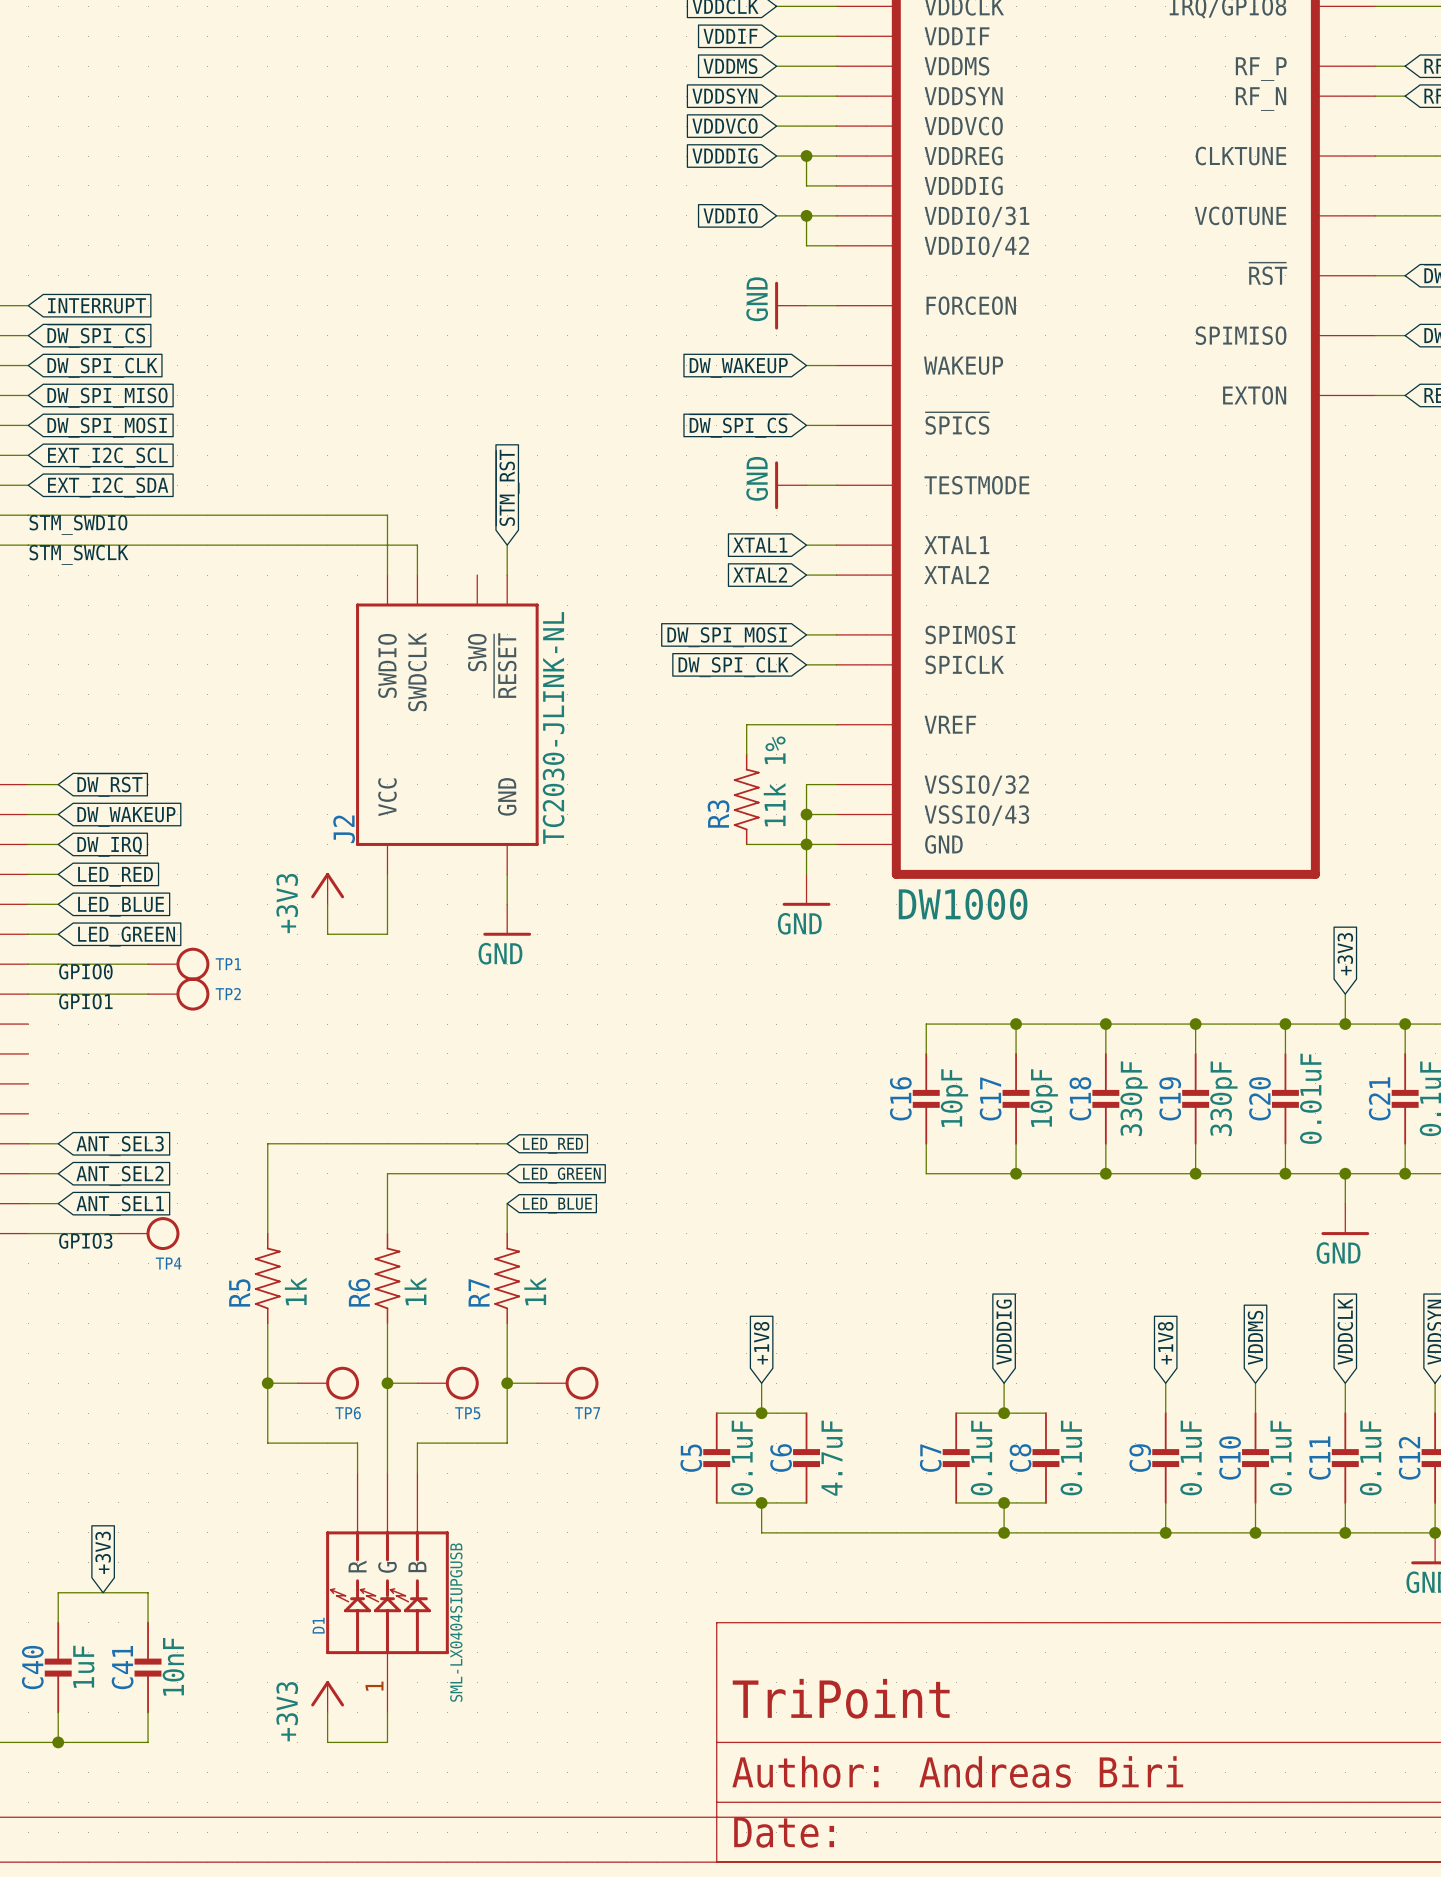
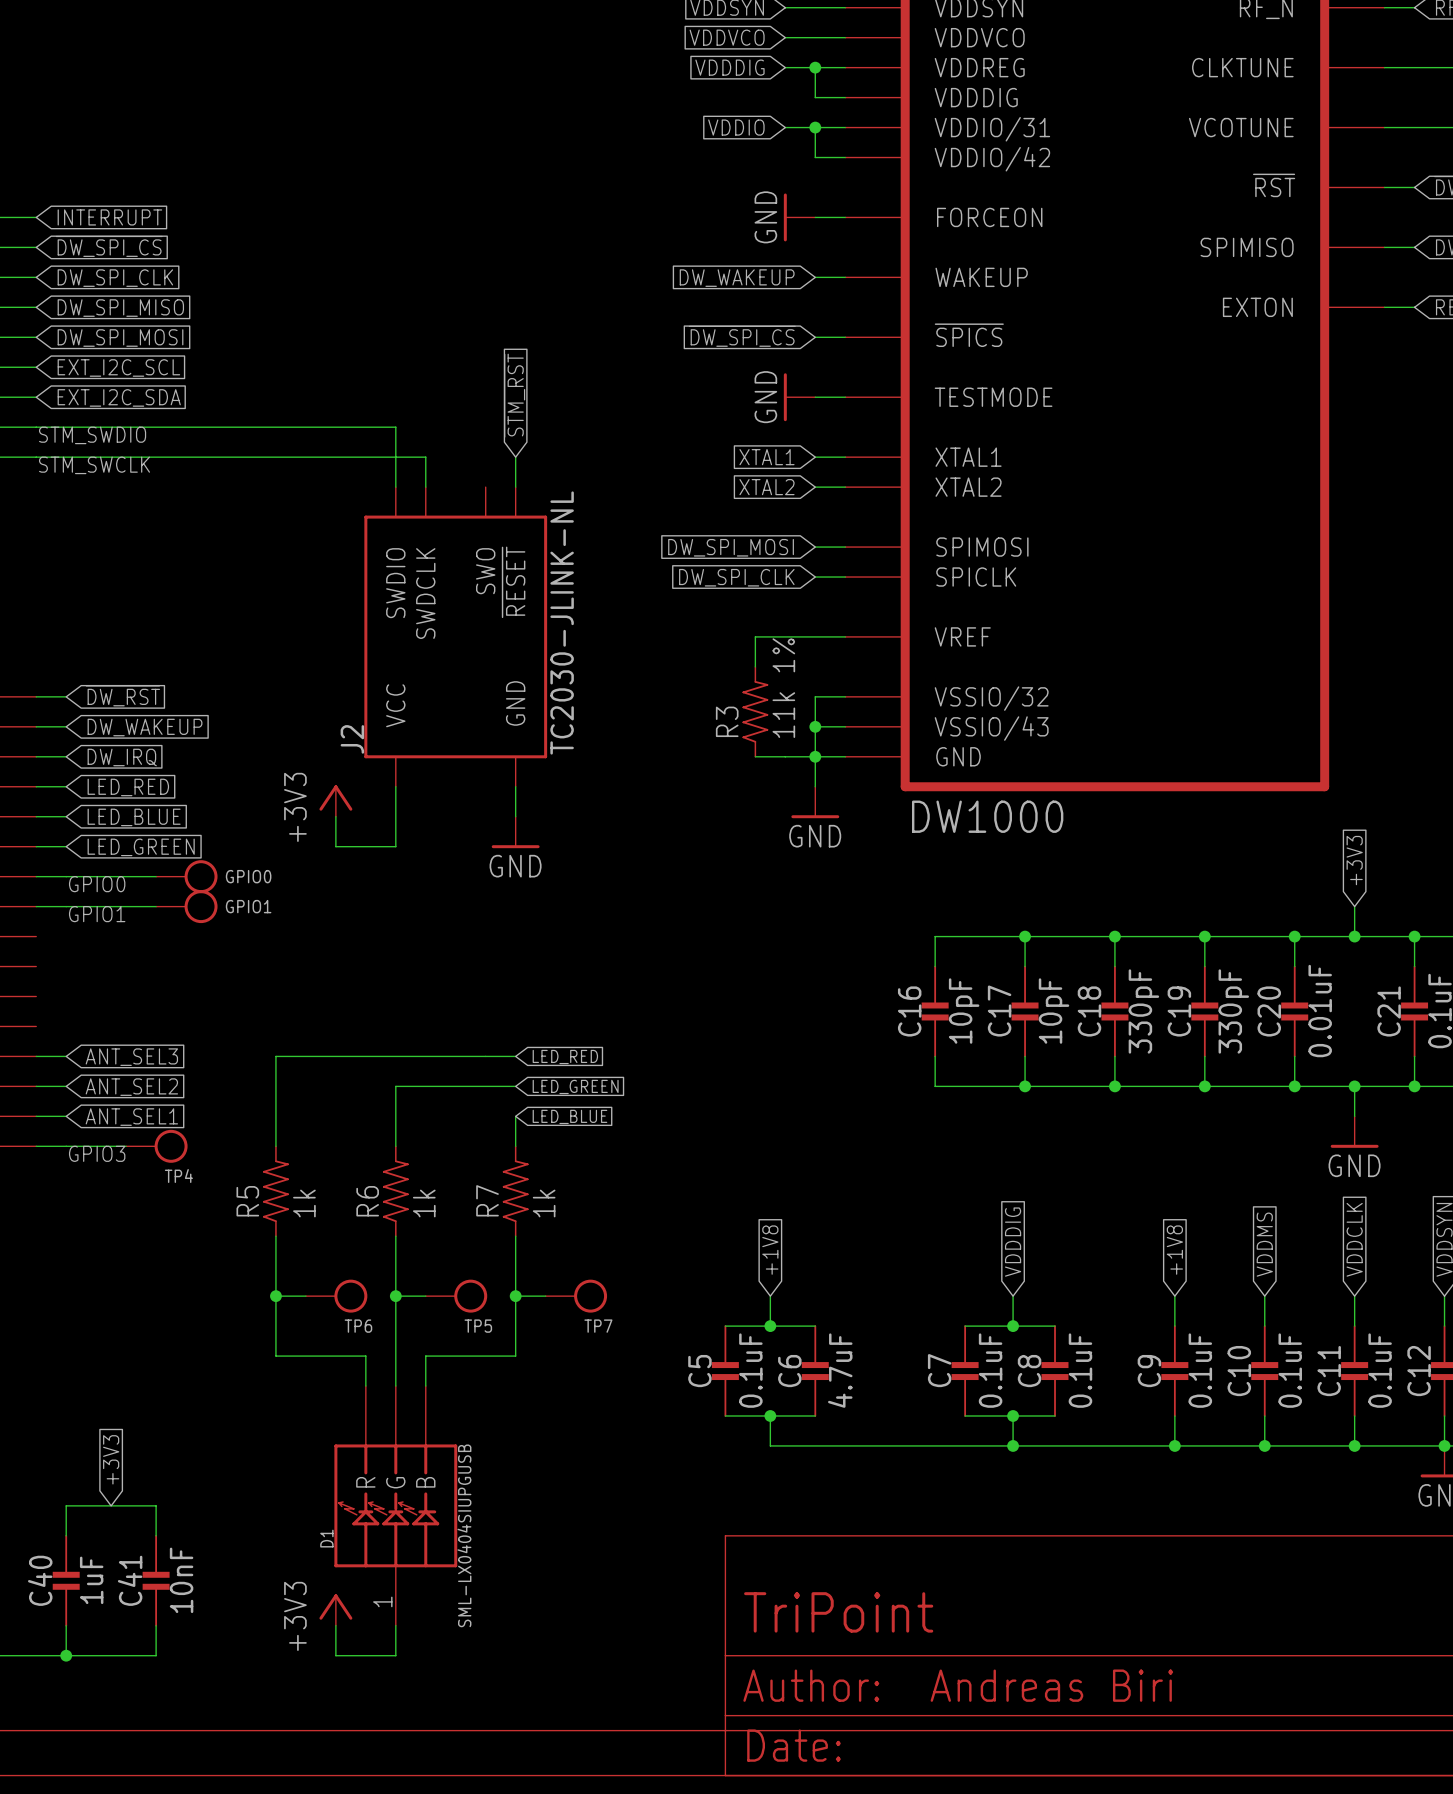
TP1 name: TP1 (228, 964) -> GPIO0 (248, 876)
TP2 name: TP2 (228, 994) -> GPIO1 (248, 906)

